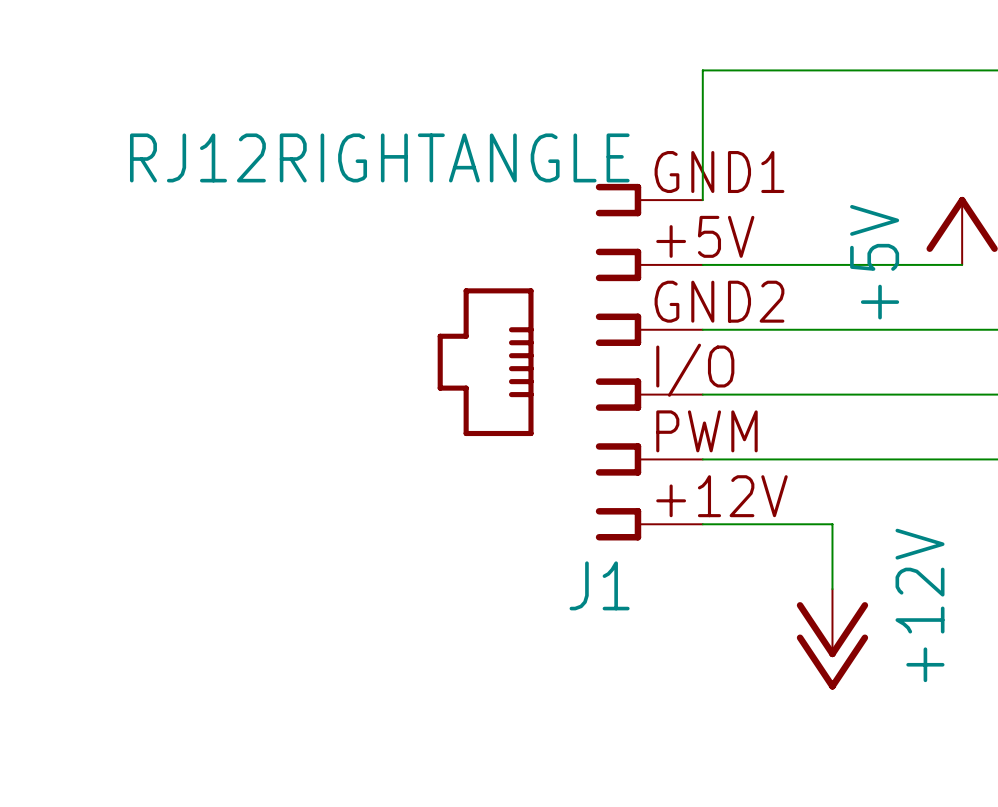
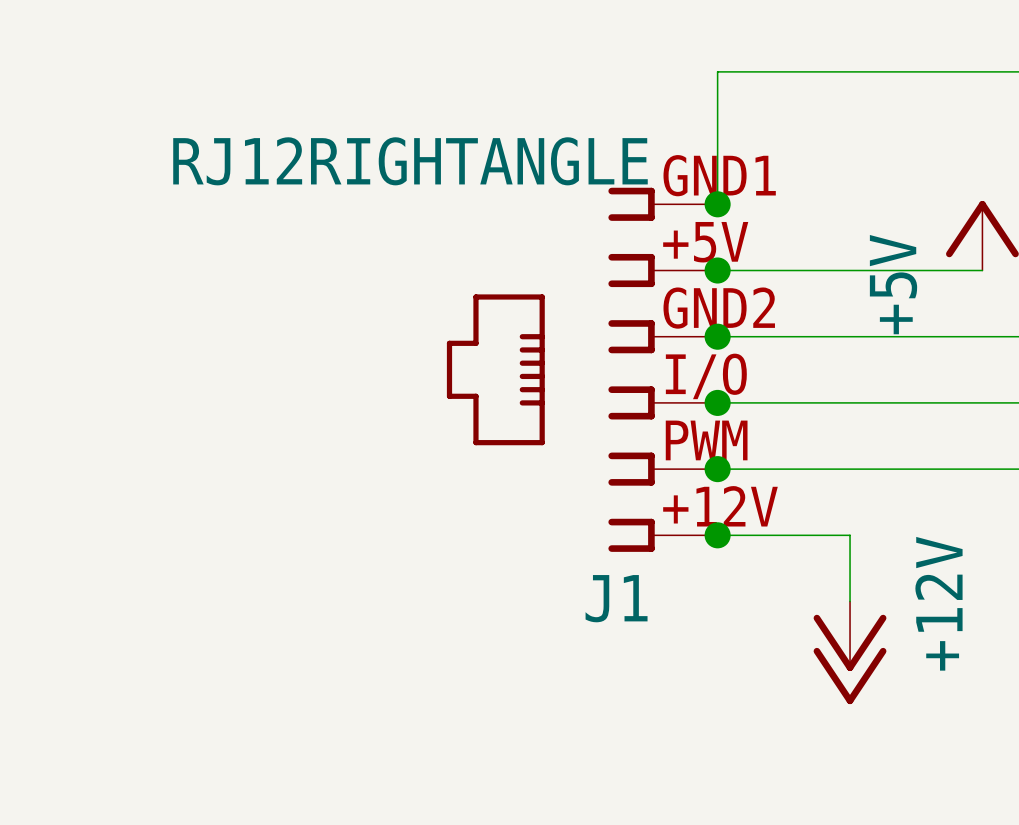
junction: none -> (717, 204)
junction: none -> (717, 270)
junction: none -> (717, 336)
junction: none -> (717, 402)
junction: none -> (717, 469)
junction: none -> (717, 535)

